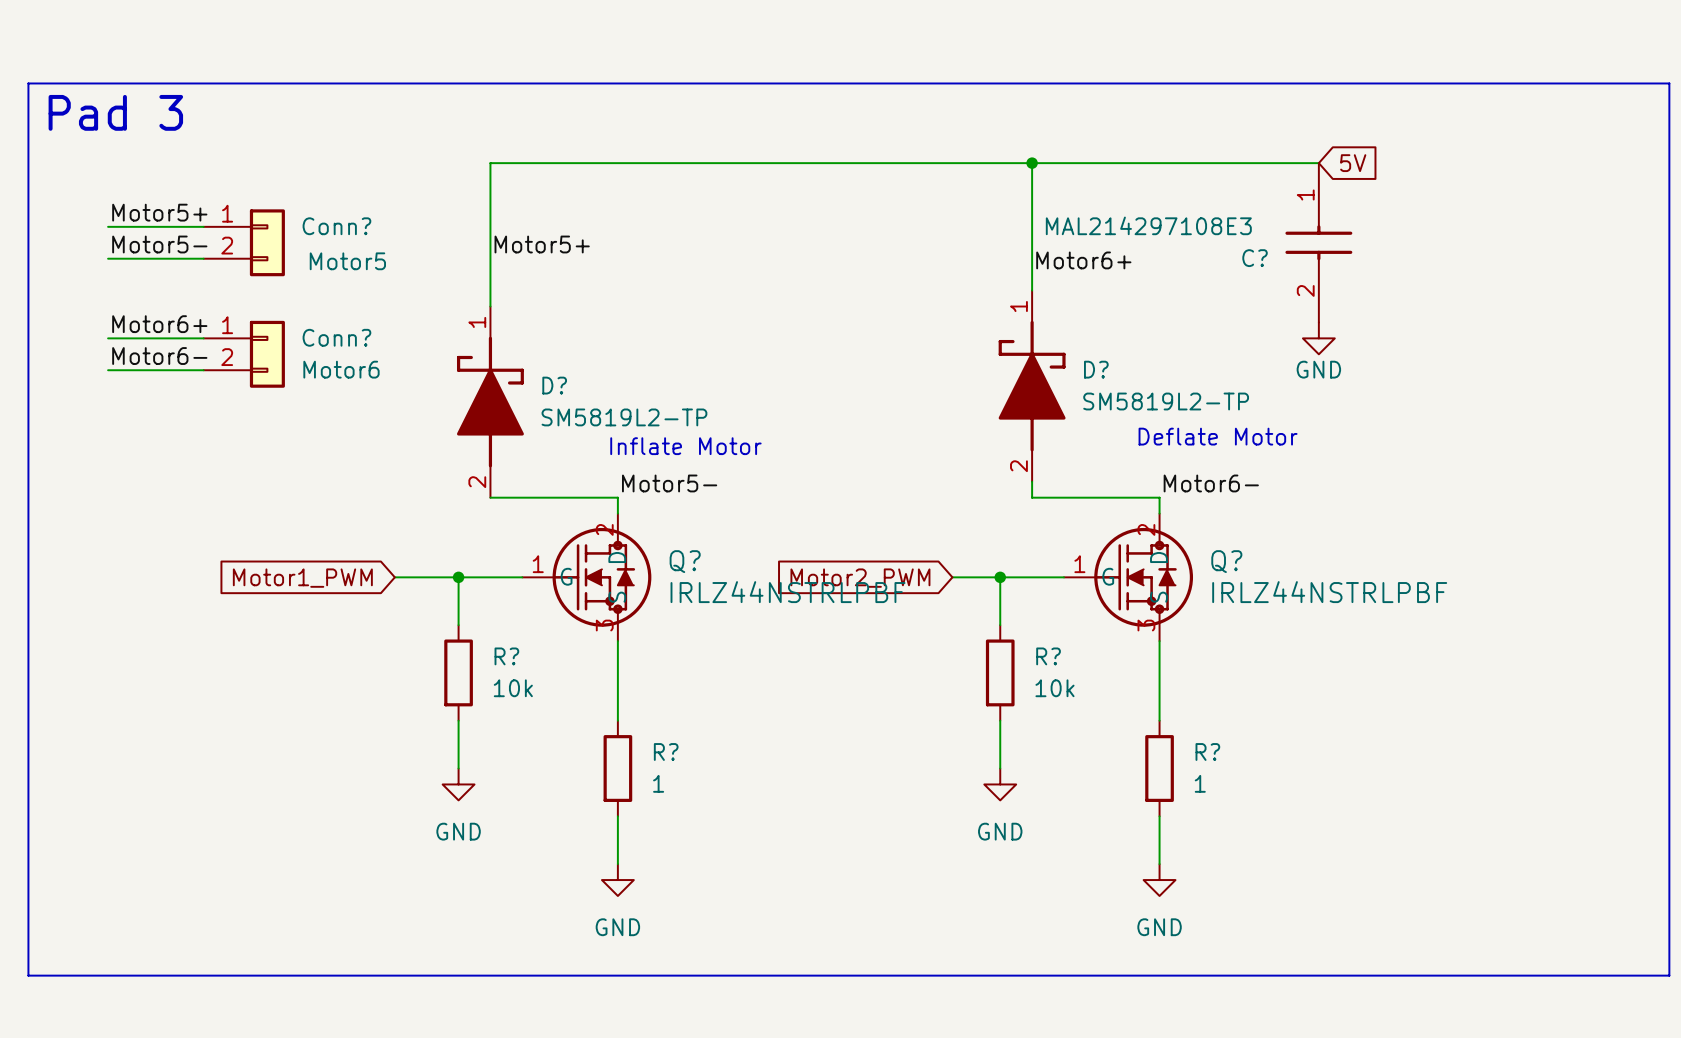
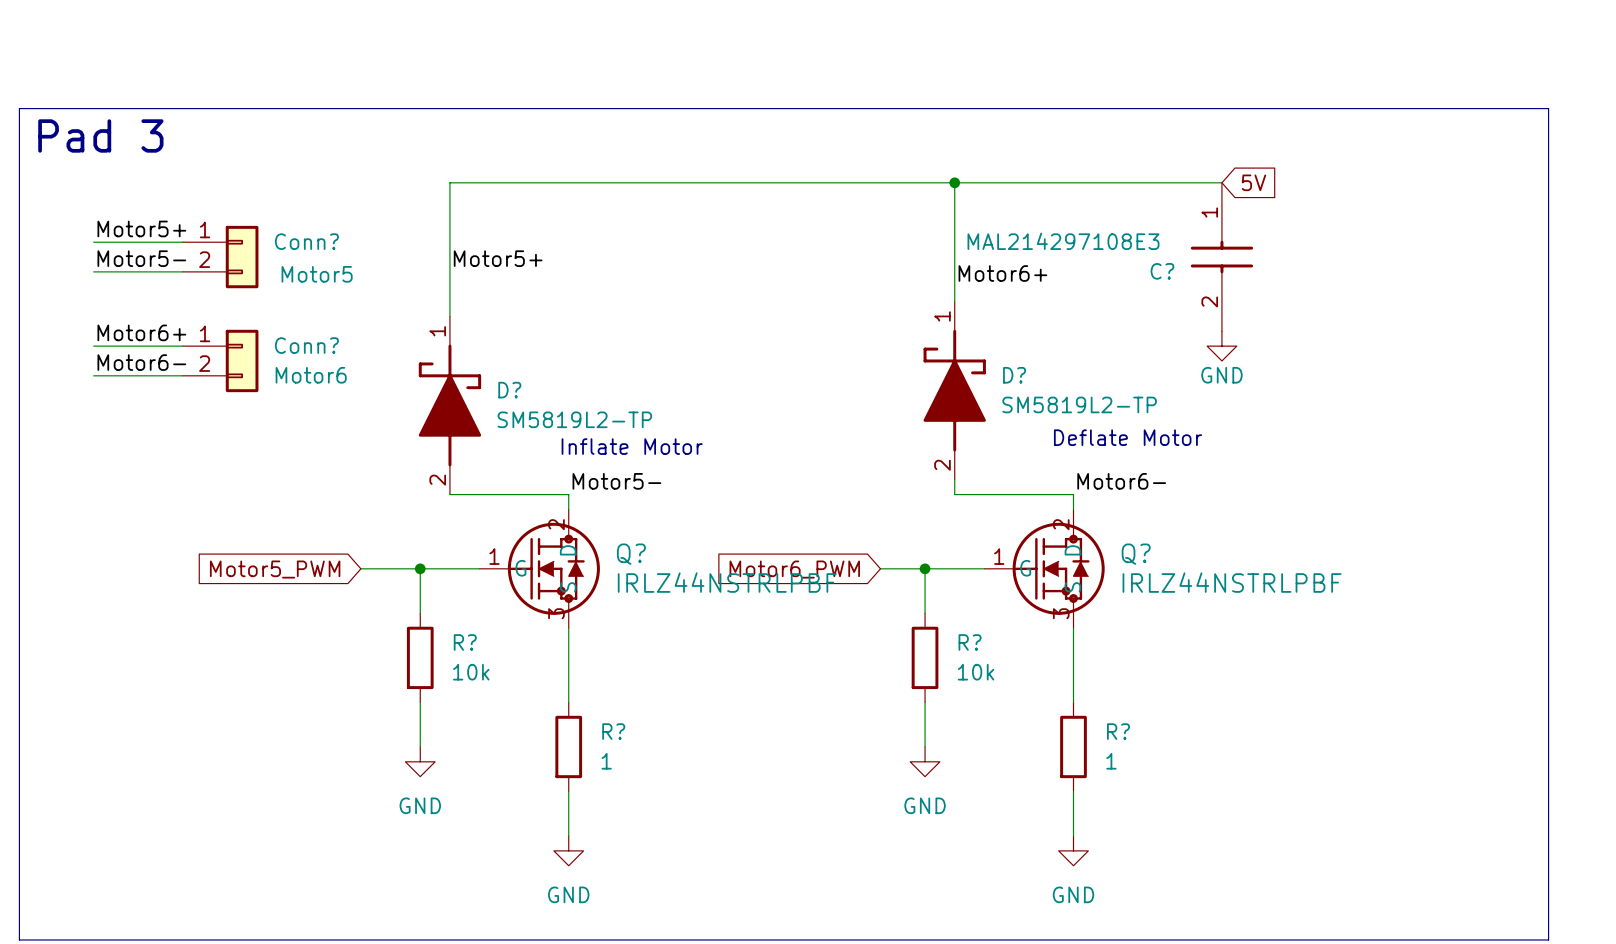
global label: Motor1_PWM (302, 578) -> Motor5_PWM (275, 569)
global label: Motor2_PWM (860, 578) -> Motor6_PWM (794, 569)

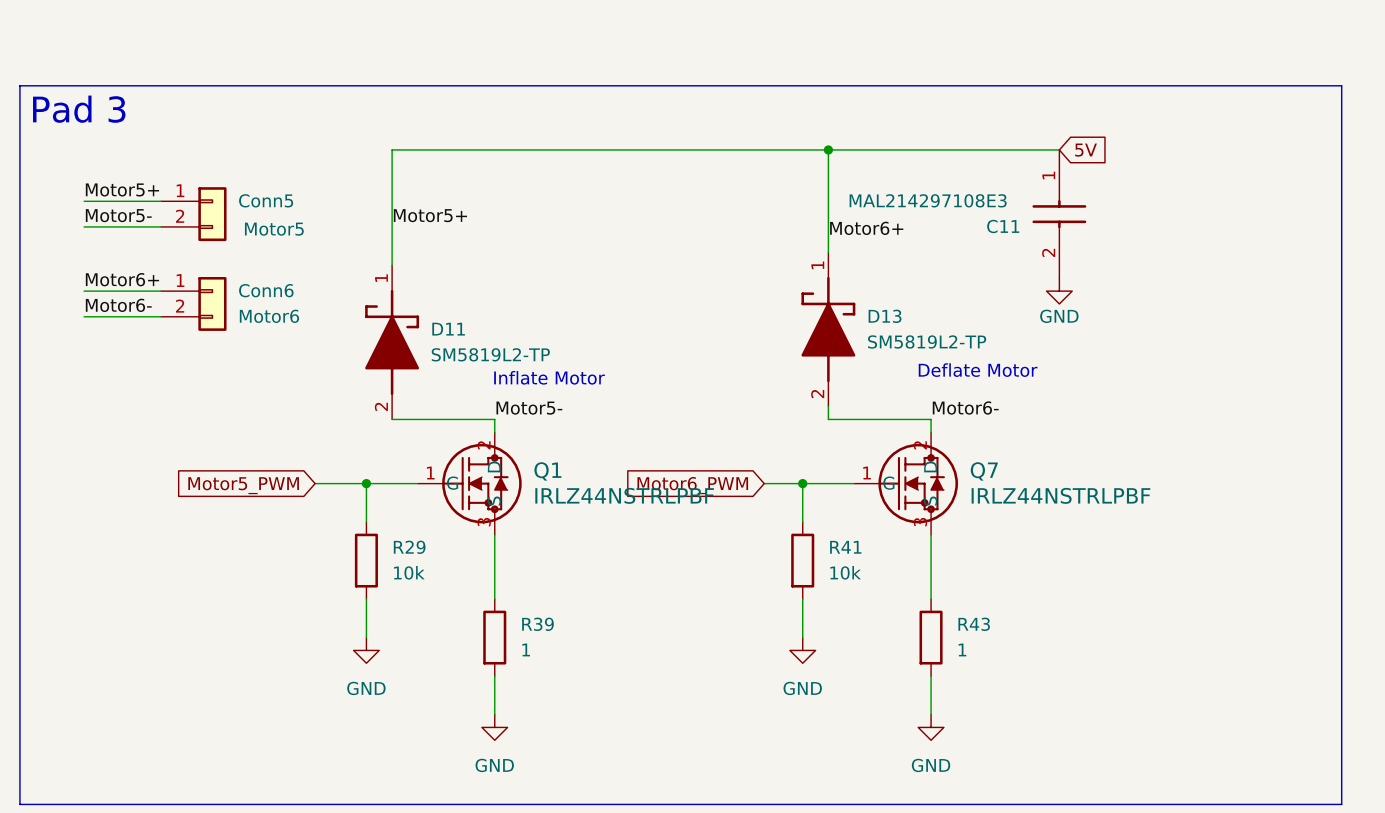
Conn? name: Conn? (306, 241) -> Conn5 (266, 200)
C? name: C? (1162, 271) -> C11 (1003, 226)
Conn? name: Conn? (306, 345) -> Conn6 (266, 290)
D? name: D? (1014, 375) -> D13 (885, 316)
D? name: D? (509, 390) -> D11 (448, 329)
Q? name: Q? (631, 554) -> Q1 (547, 471)
Q? name: Q? (1136, 554) -> Q7 (984, 471)
R? name: R? (465, 642) -> R29 (409, 547)
R? name: R? (970, 642) -> R41 (845, 547)
R? name: R? (613, 731) -> R39 (537, 624)
R? name: R? (1118, 731) -> R43 (974, 624)

